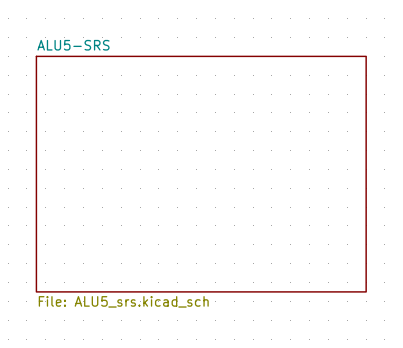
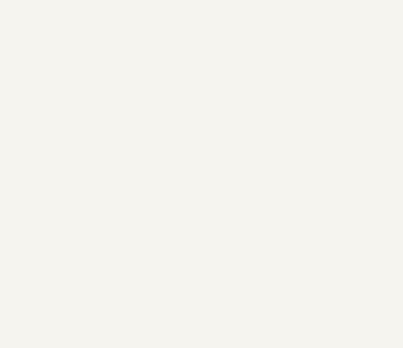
sheet ALU5-SRS: File: ALU5_srs.kicad_sch (201, 174) -> none

